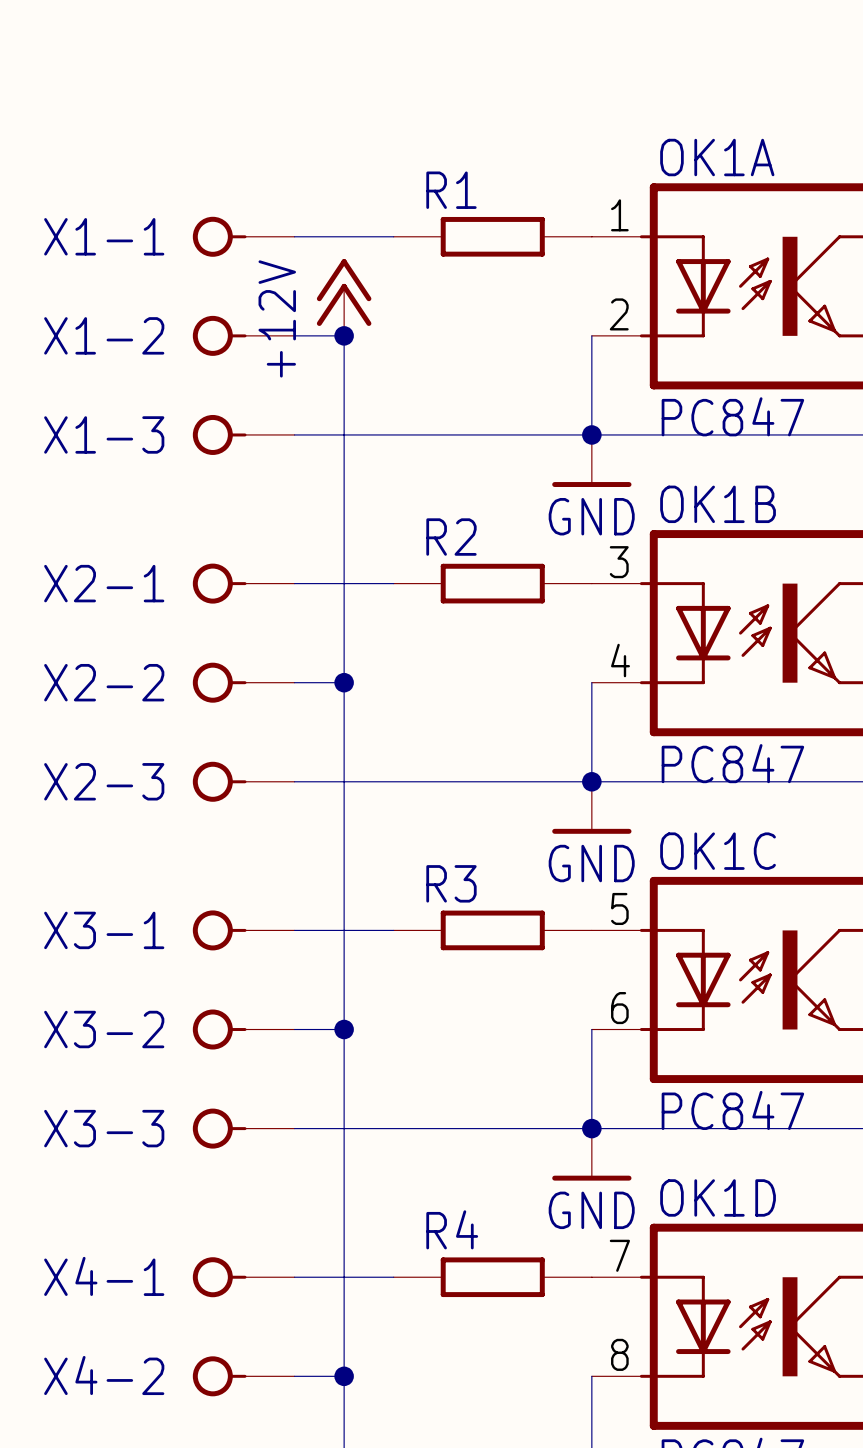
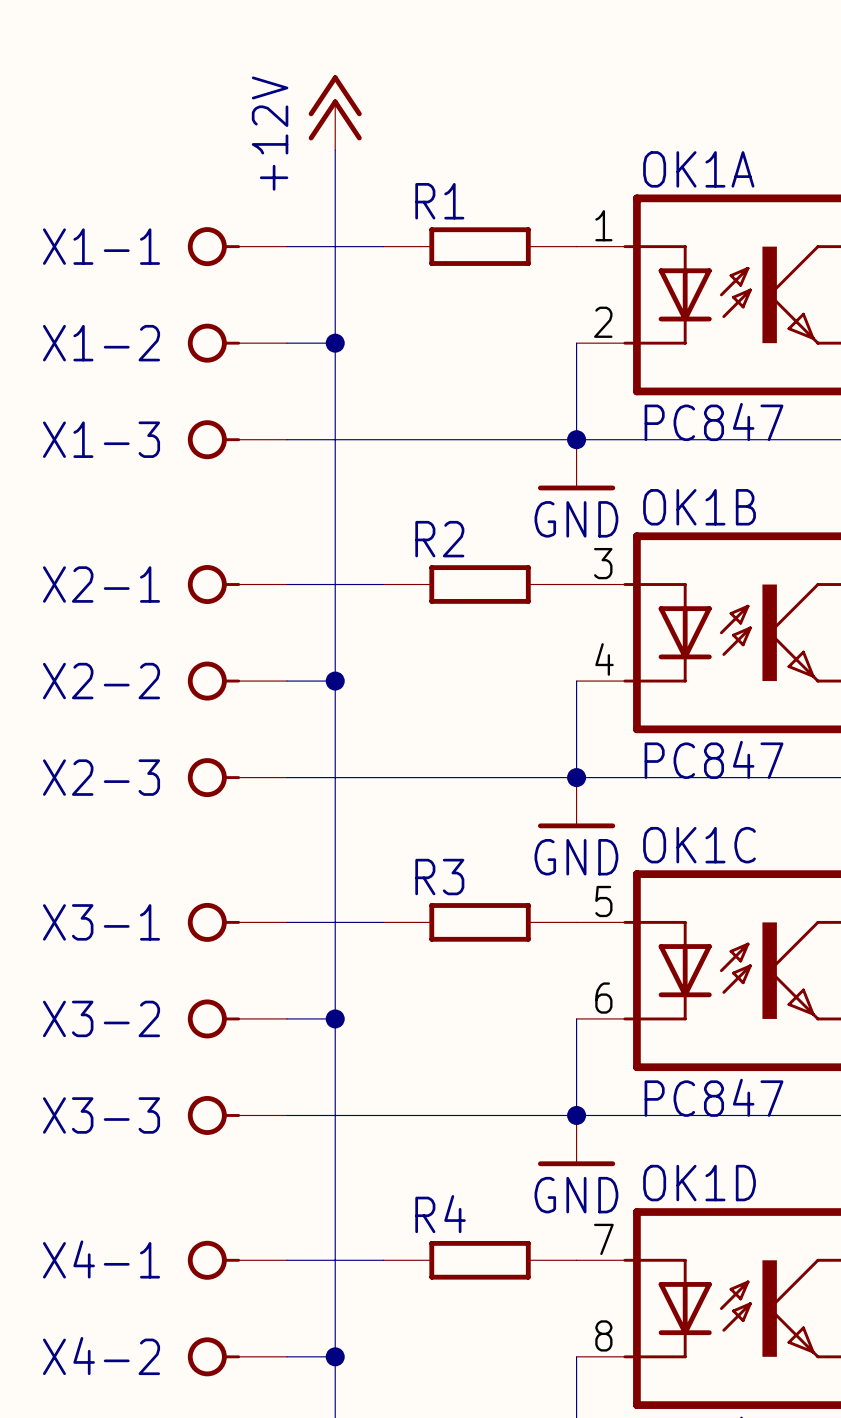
wire: none -> (335, 150) (335, 343)
power symbol position: +12V (344, 297) -> +12V (335, 112)

